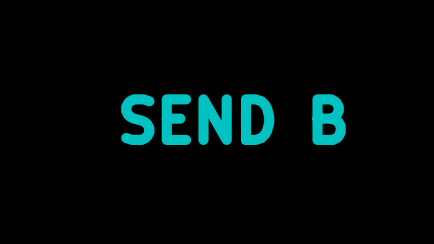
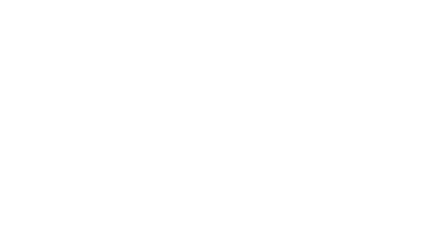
text: SEND B (233, 119) -> none

